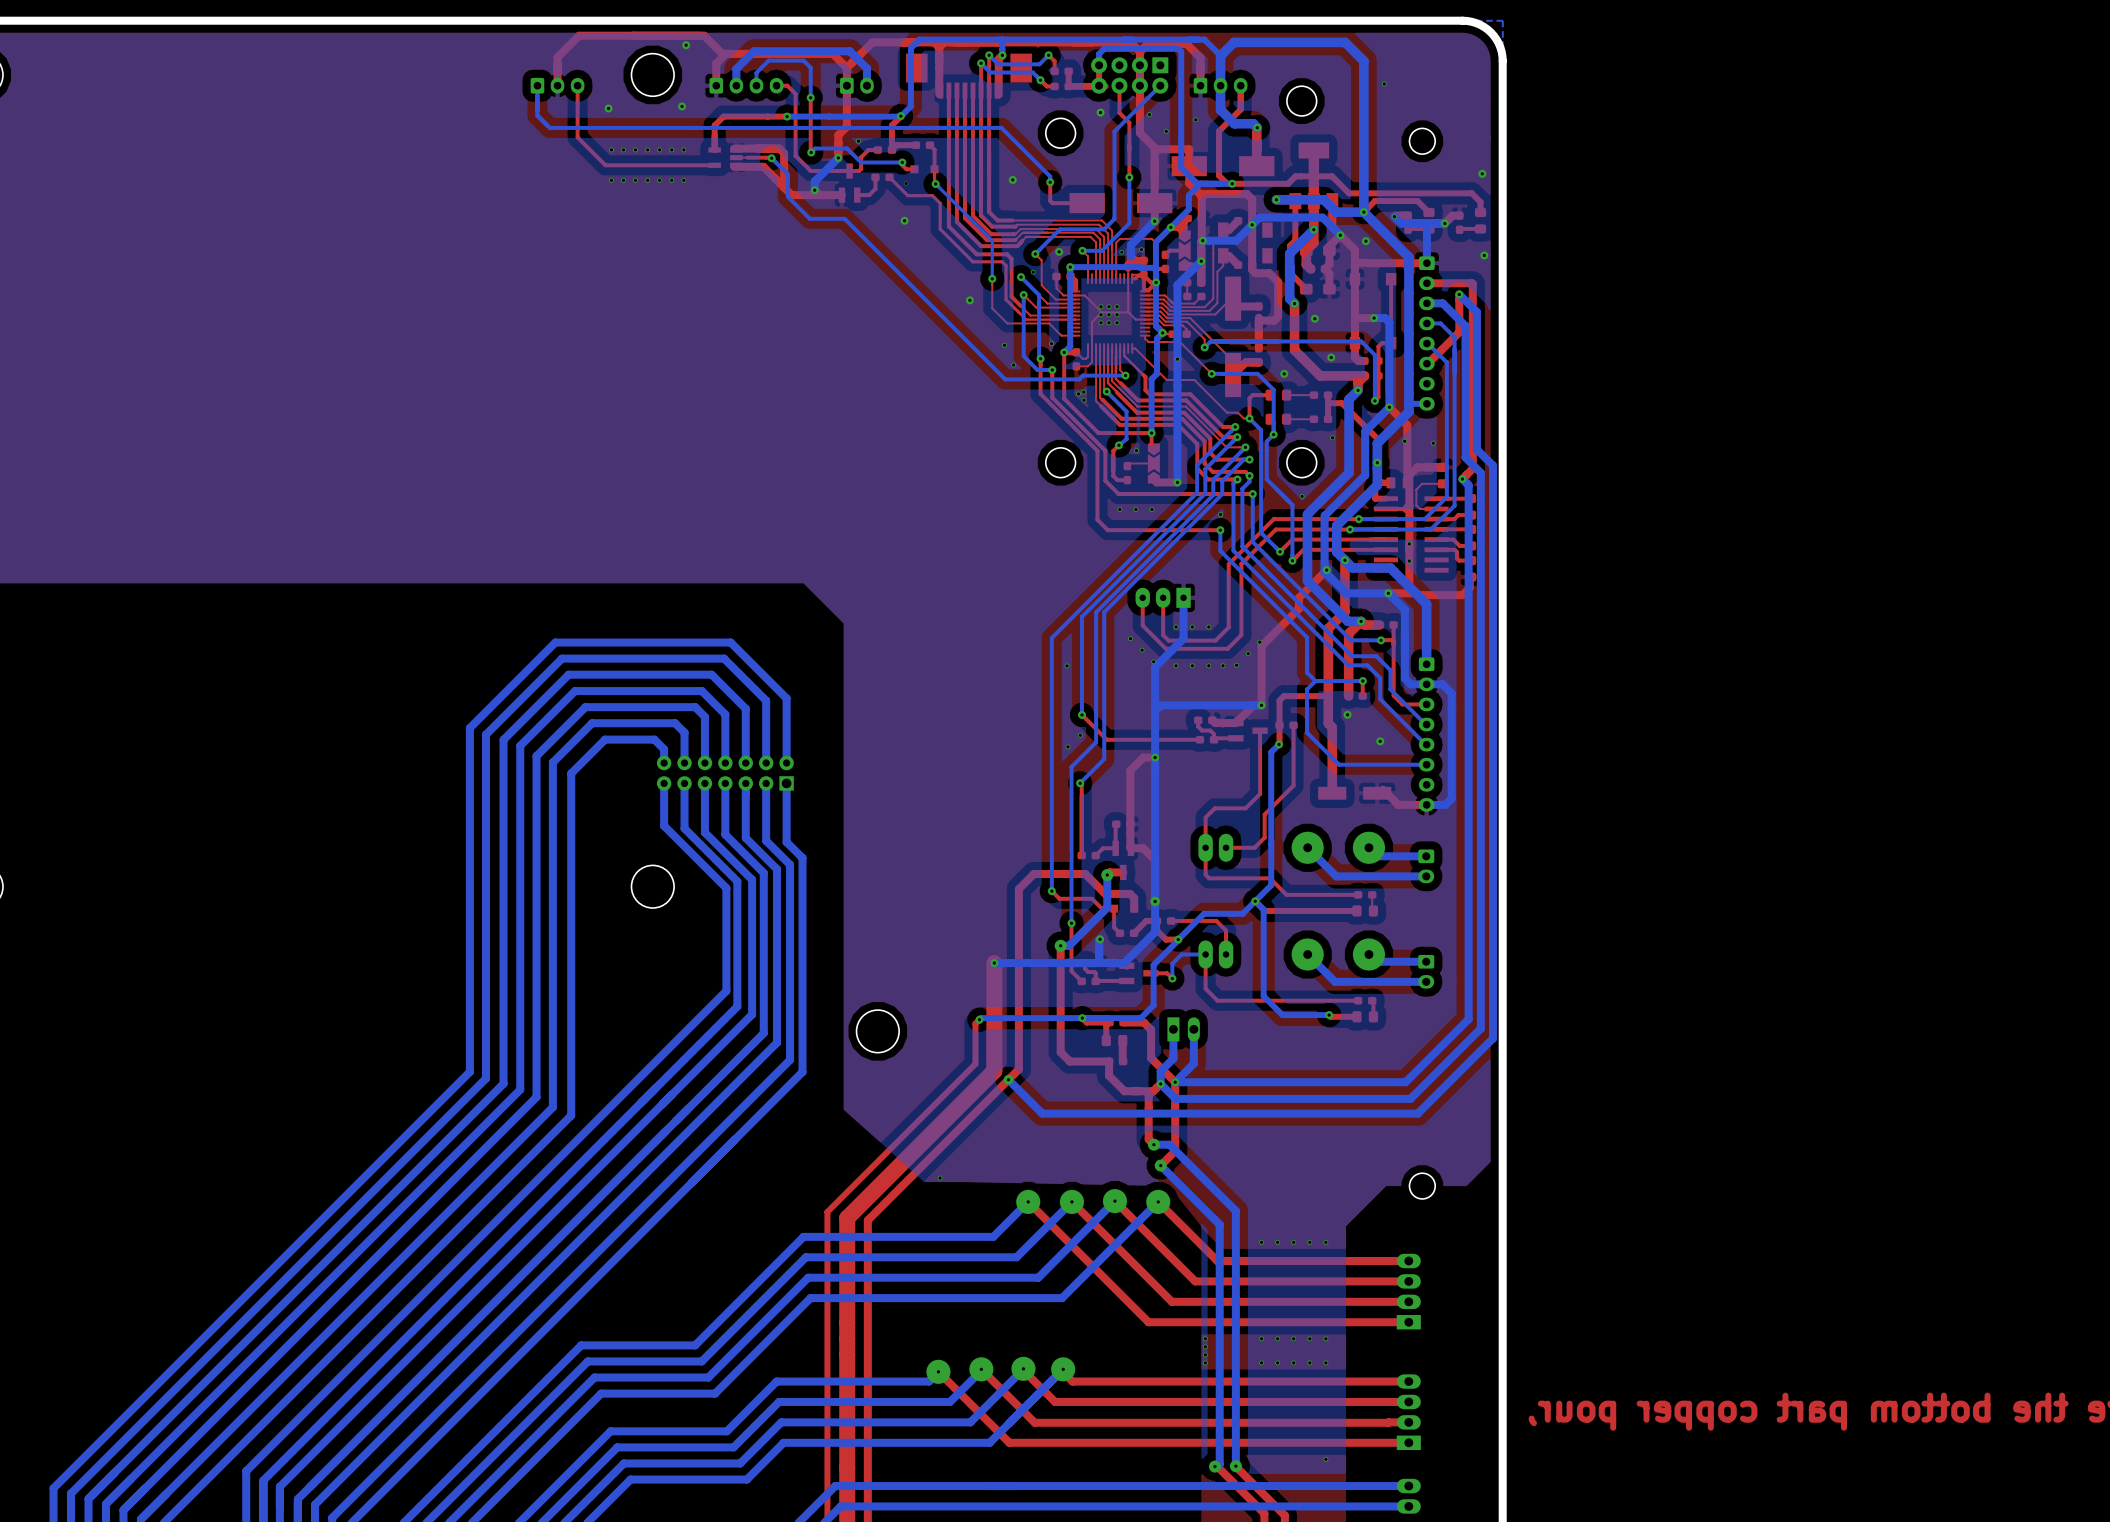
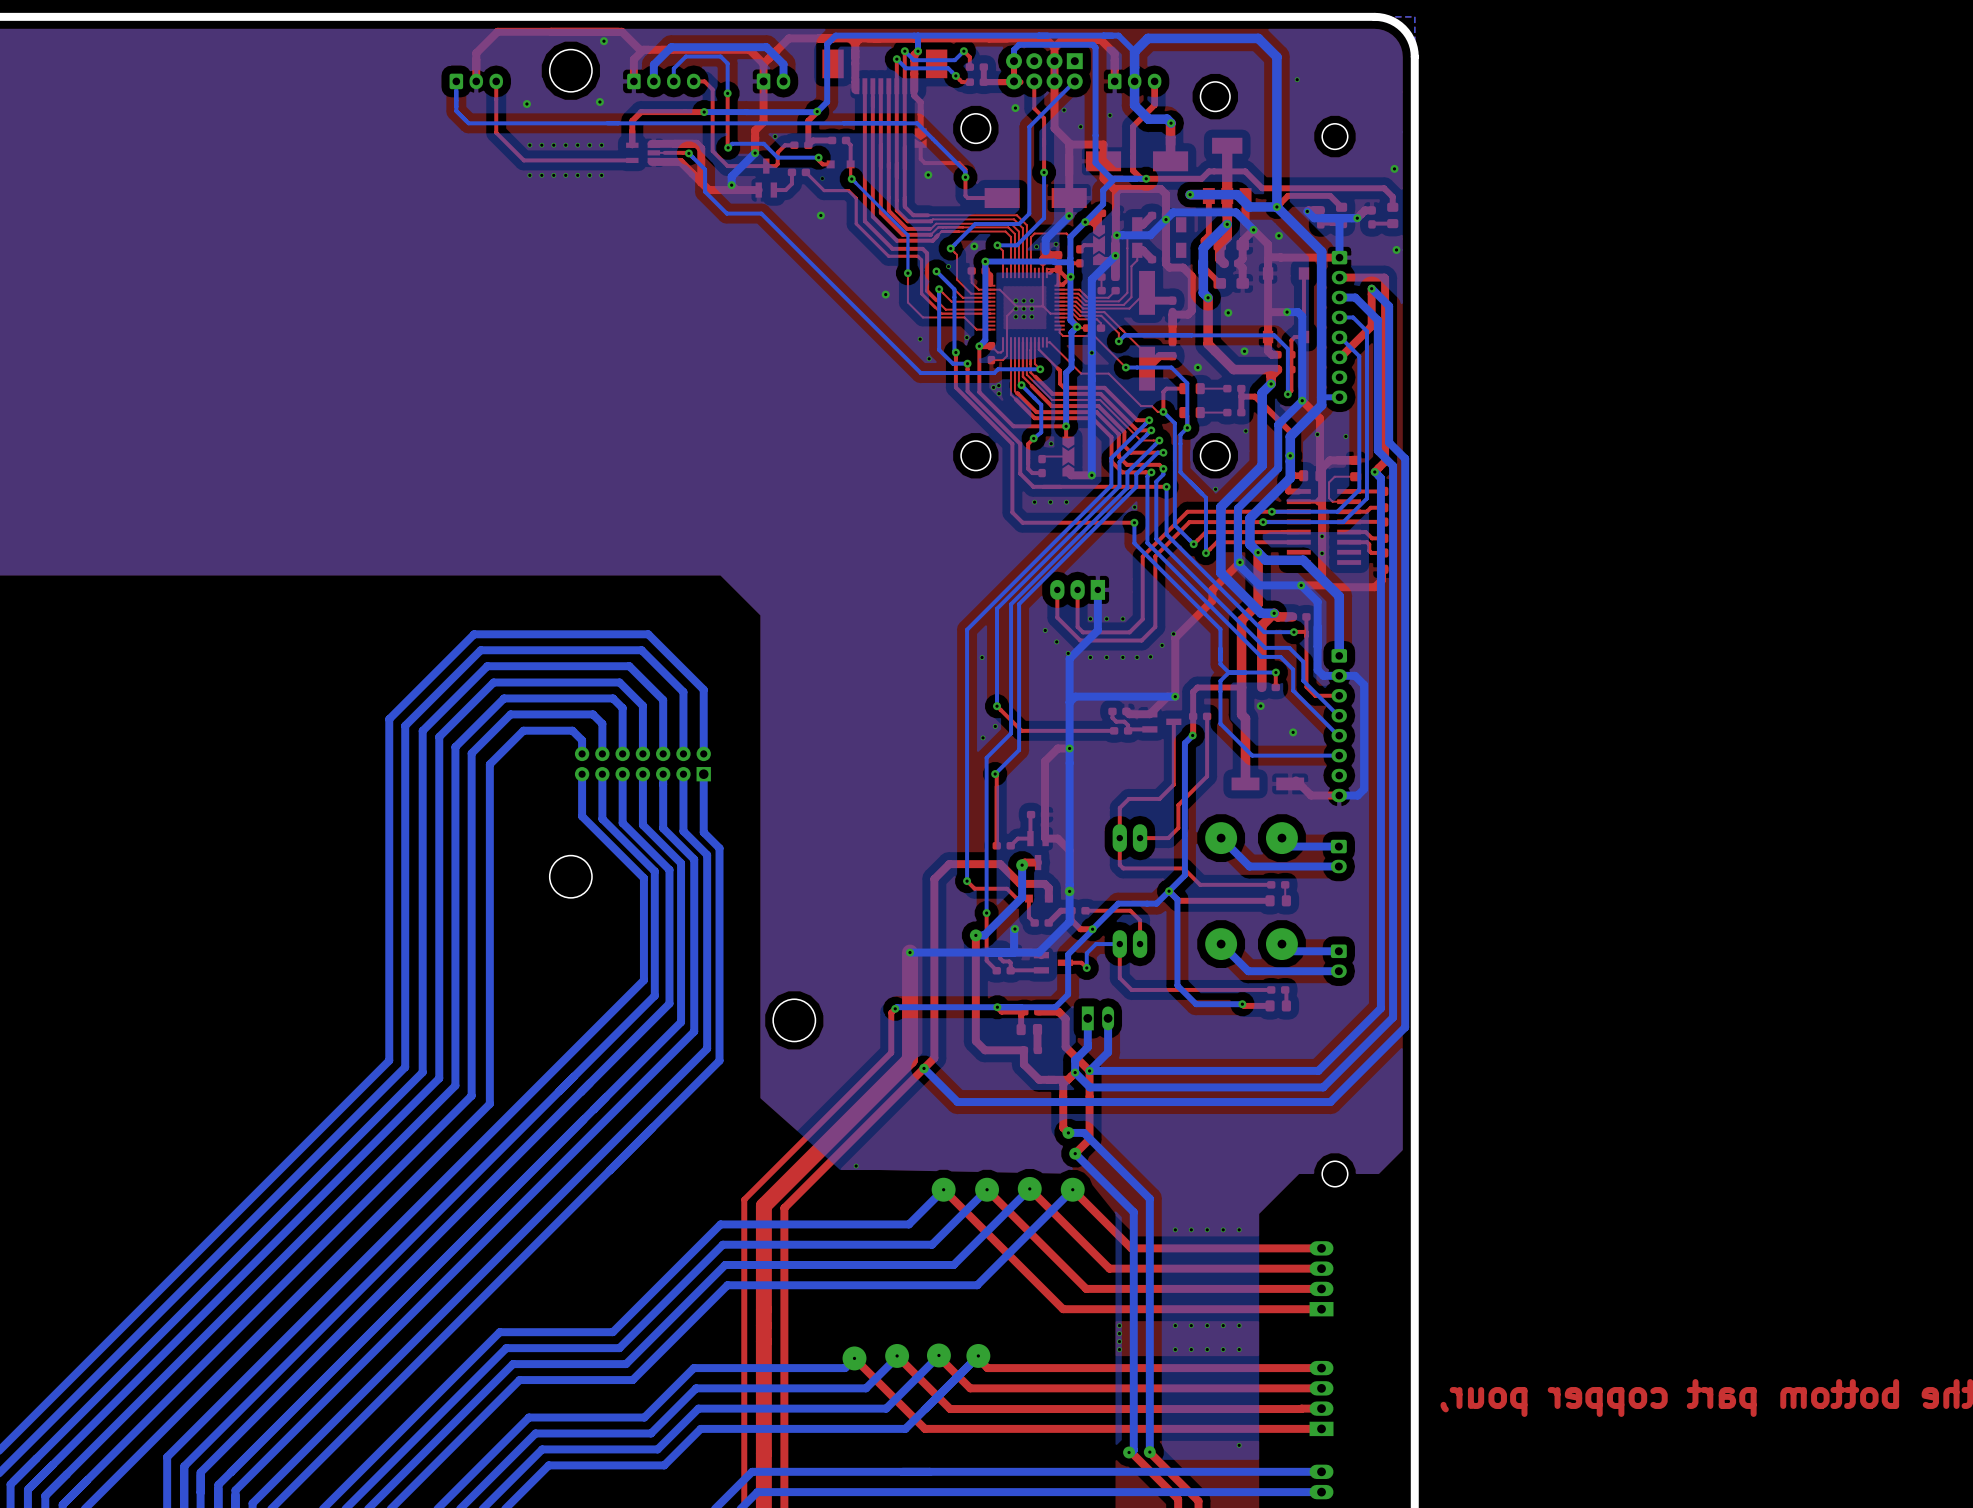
top track: none -> (914, 73) (914, 95) (920, 102) (920, 132)
part: none -> (920, 138)
top track: none -> (920, 143) (920, 158) (924, 163) (959, 163) (965, 169) (965, 177)

